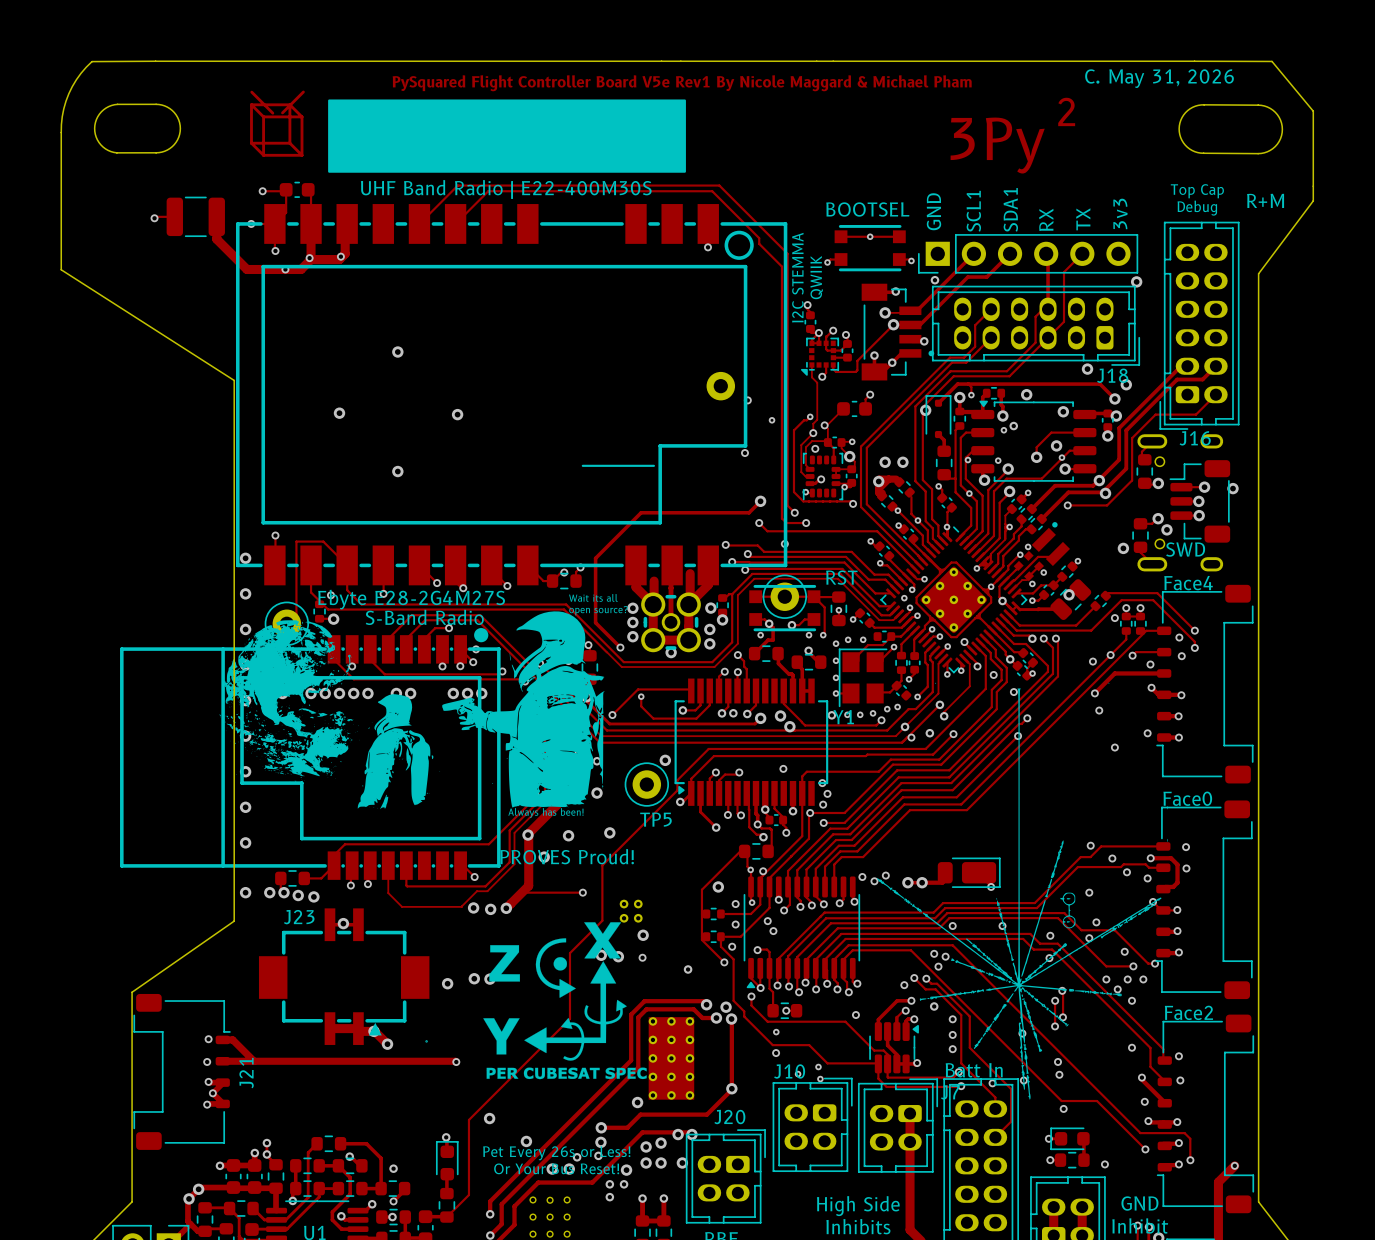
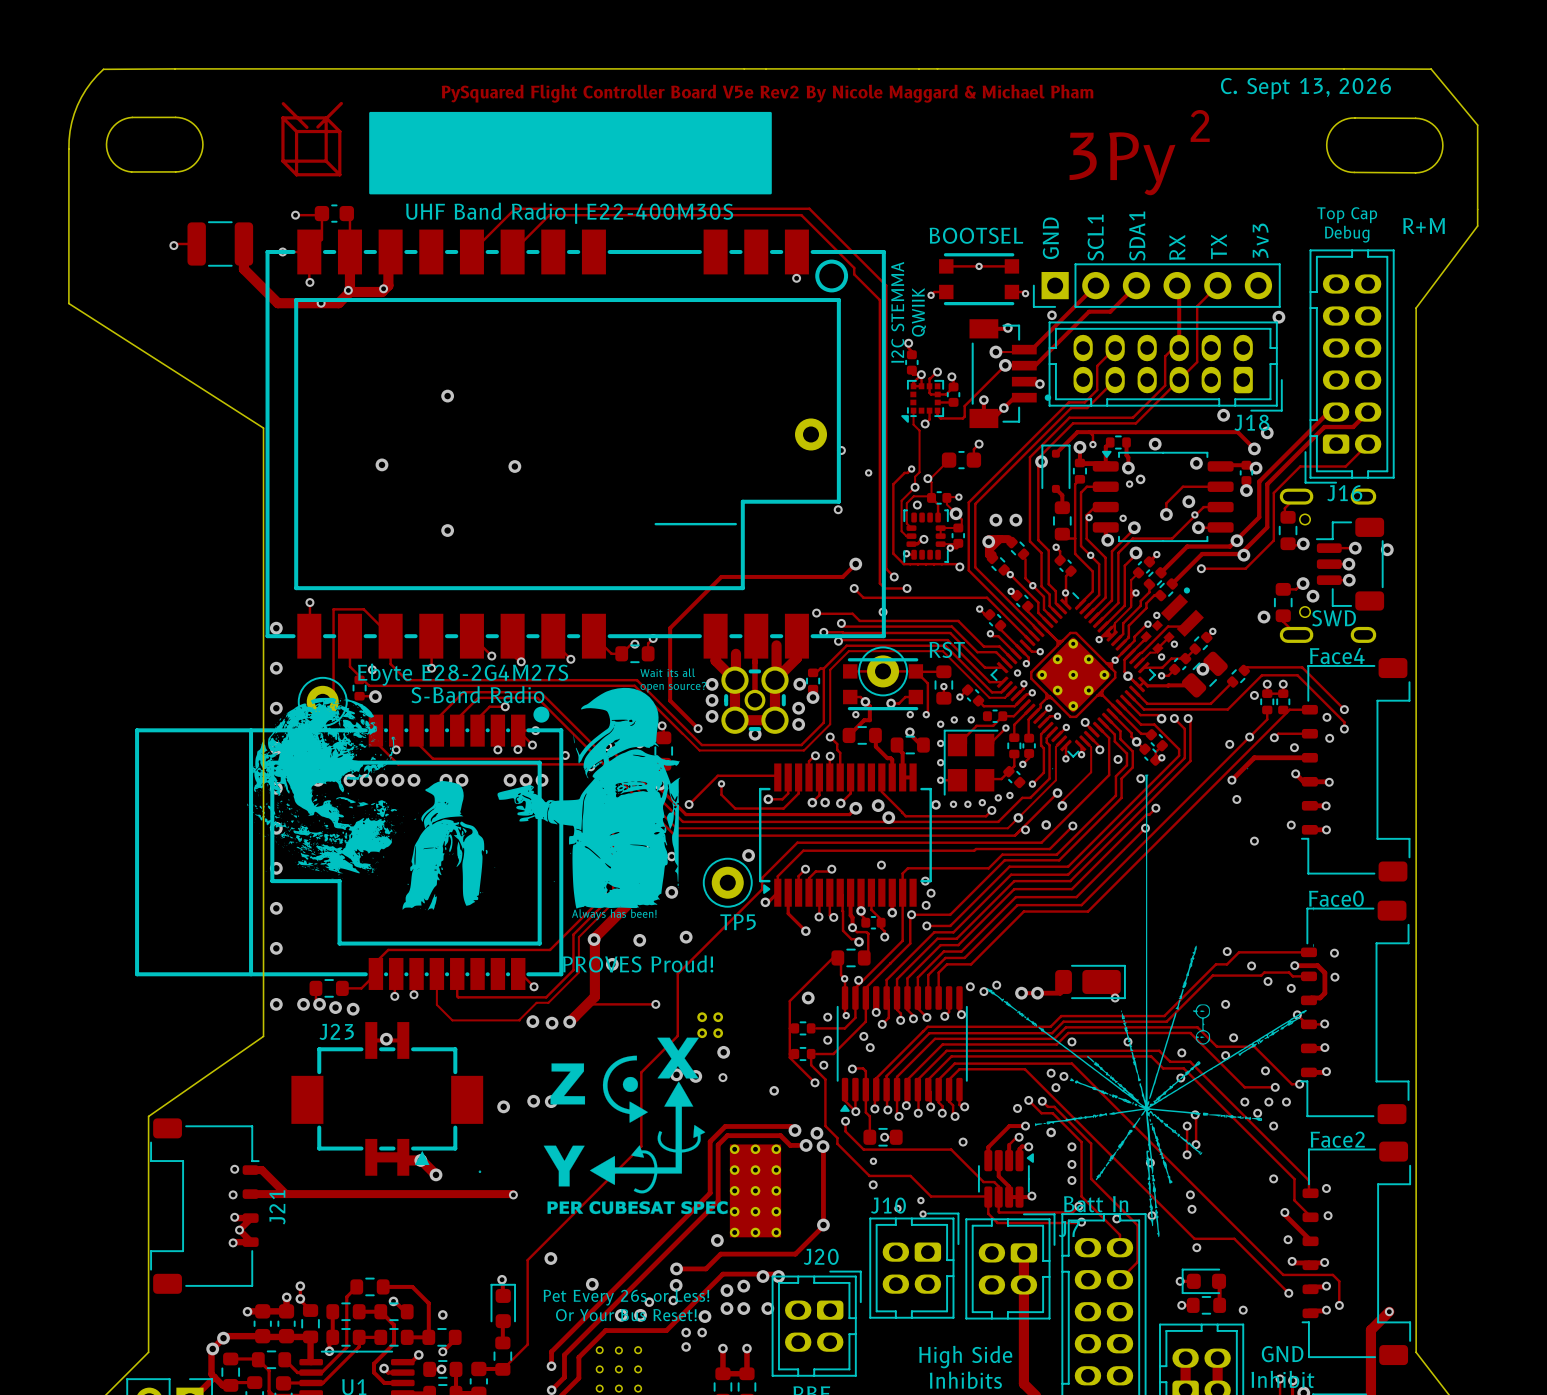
text: C. May 31, 2026 (1159, 78) -> C. Sept 13, 2026 (1305, 88)
text: PySquared Flight Controller Board V5e Rev1 By Nicole Maggard & Michael Pham (682, 83) -> PySquared Flight Controller Board V5e Rev2 By Nicole Maggard & Michael Pham (767, 93)
Y1 name: Y1 (843, 717) -> none

